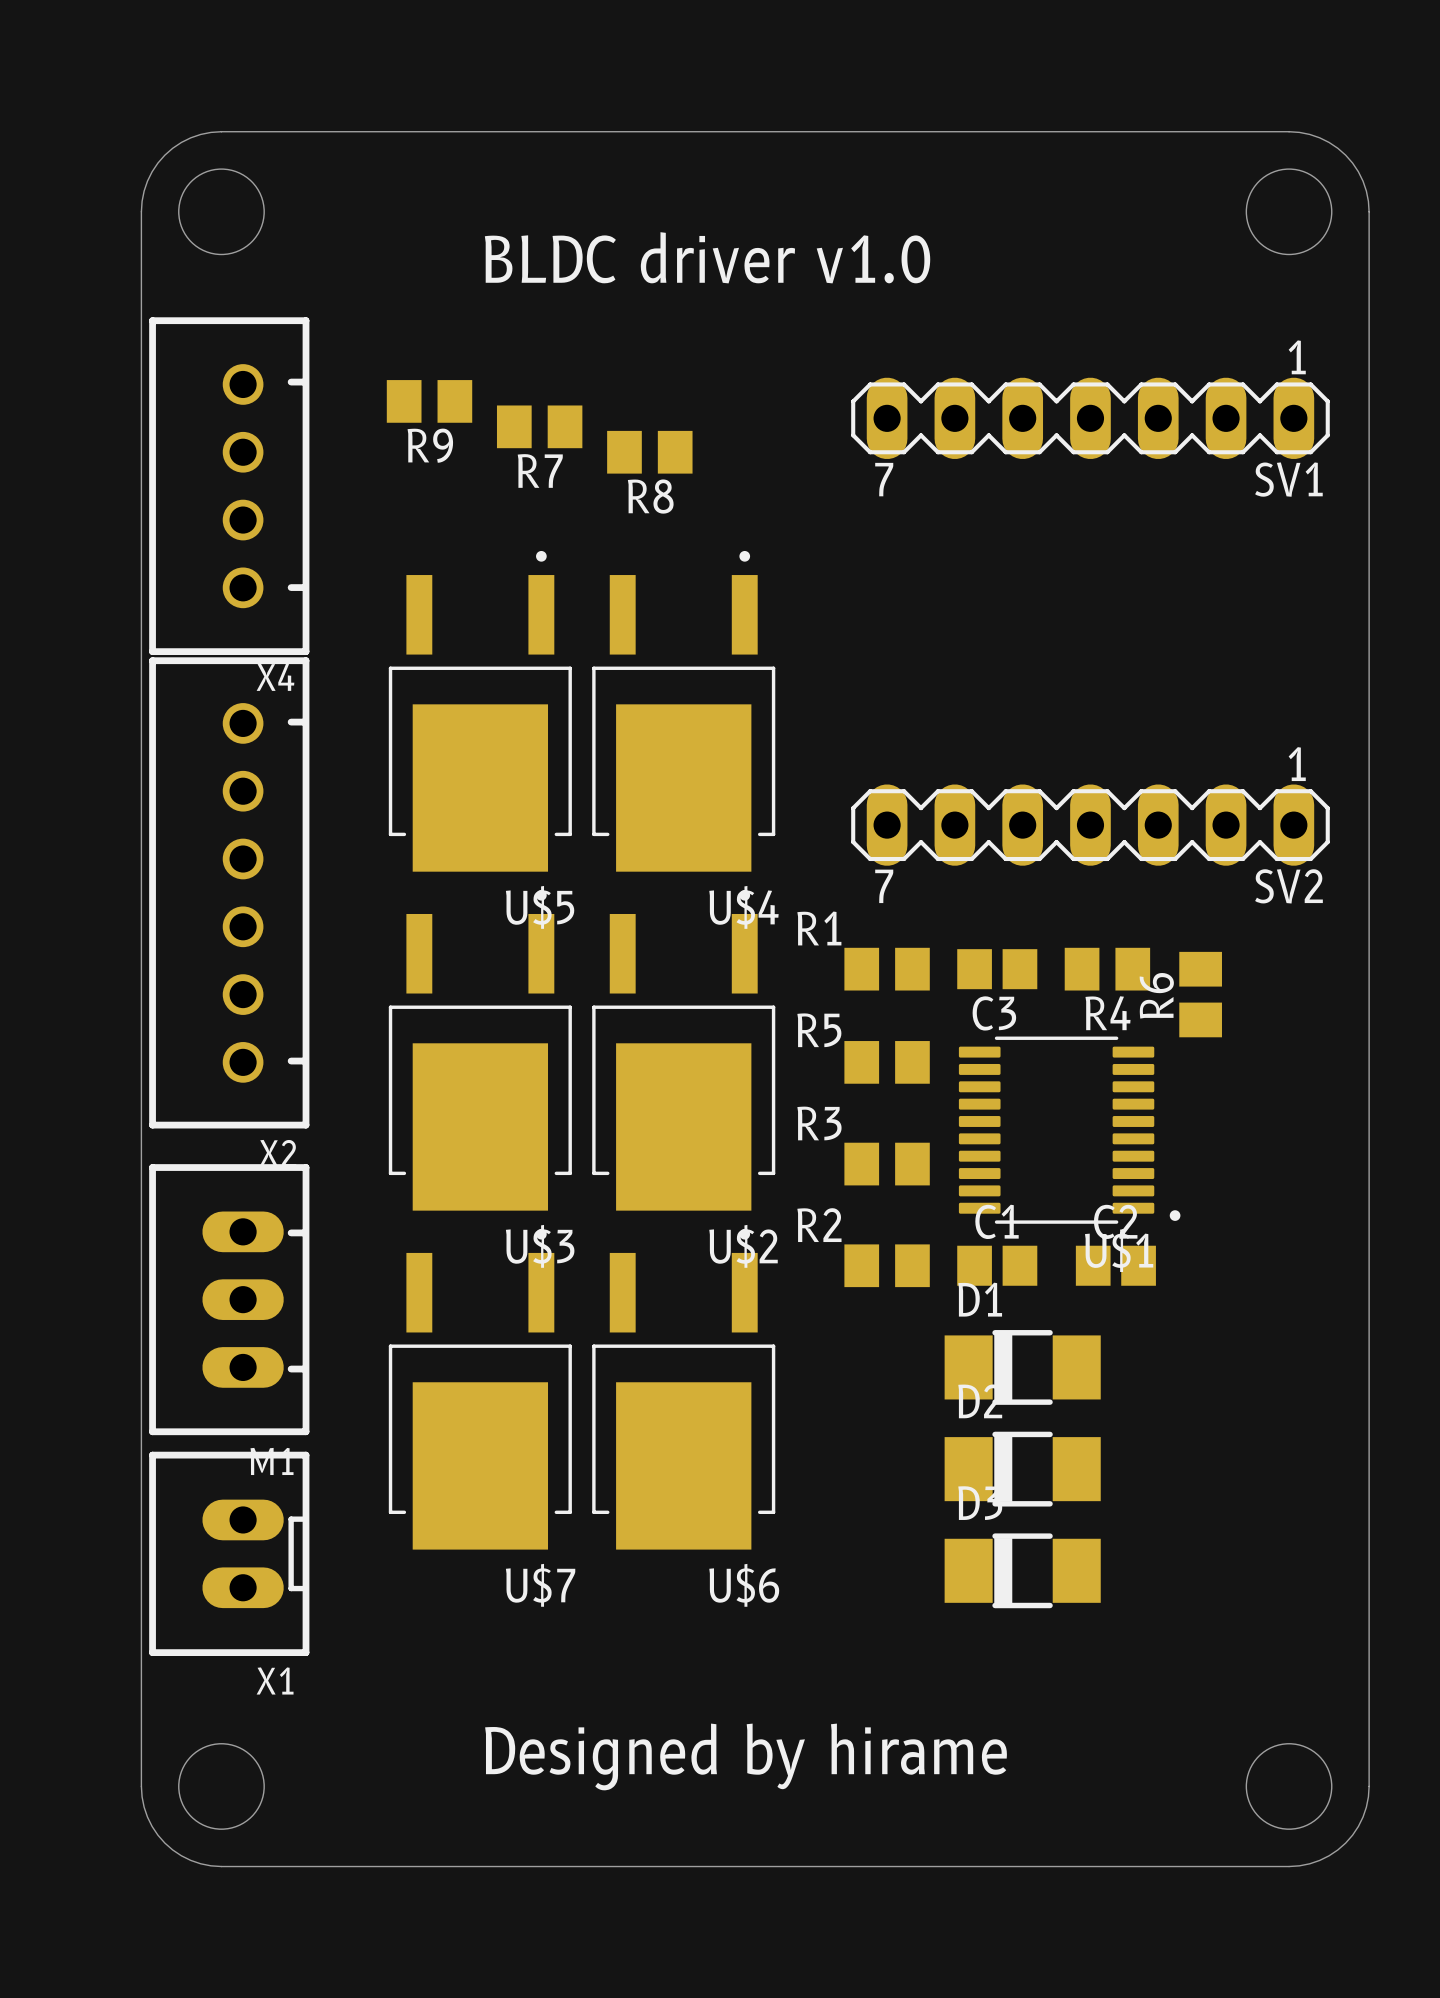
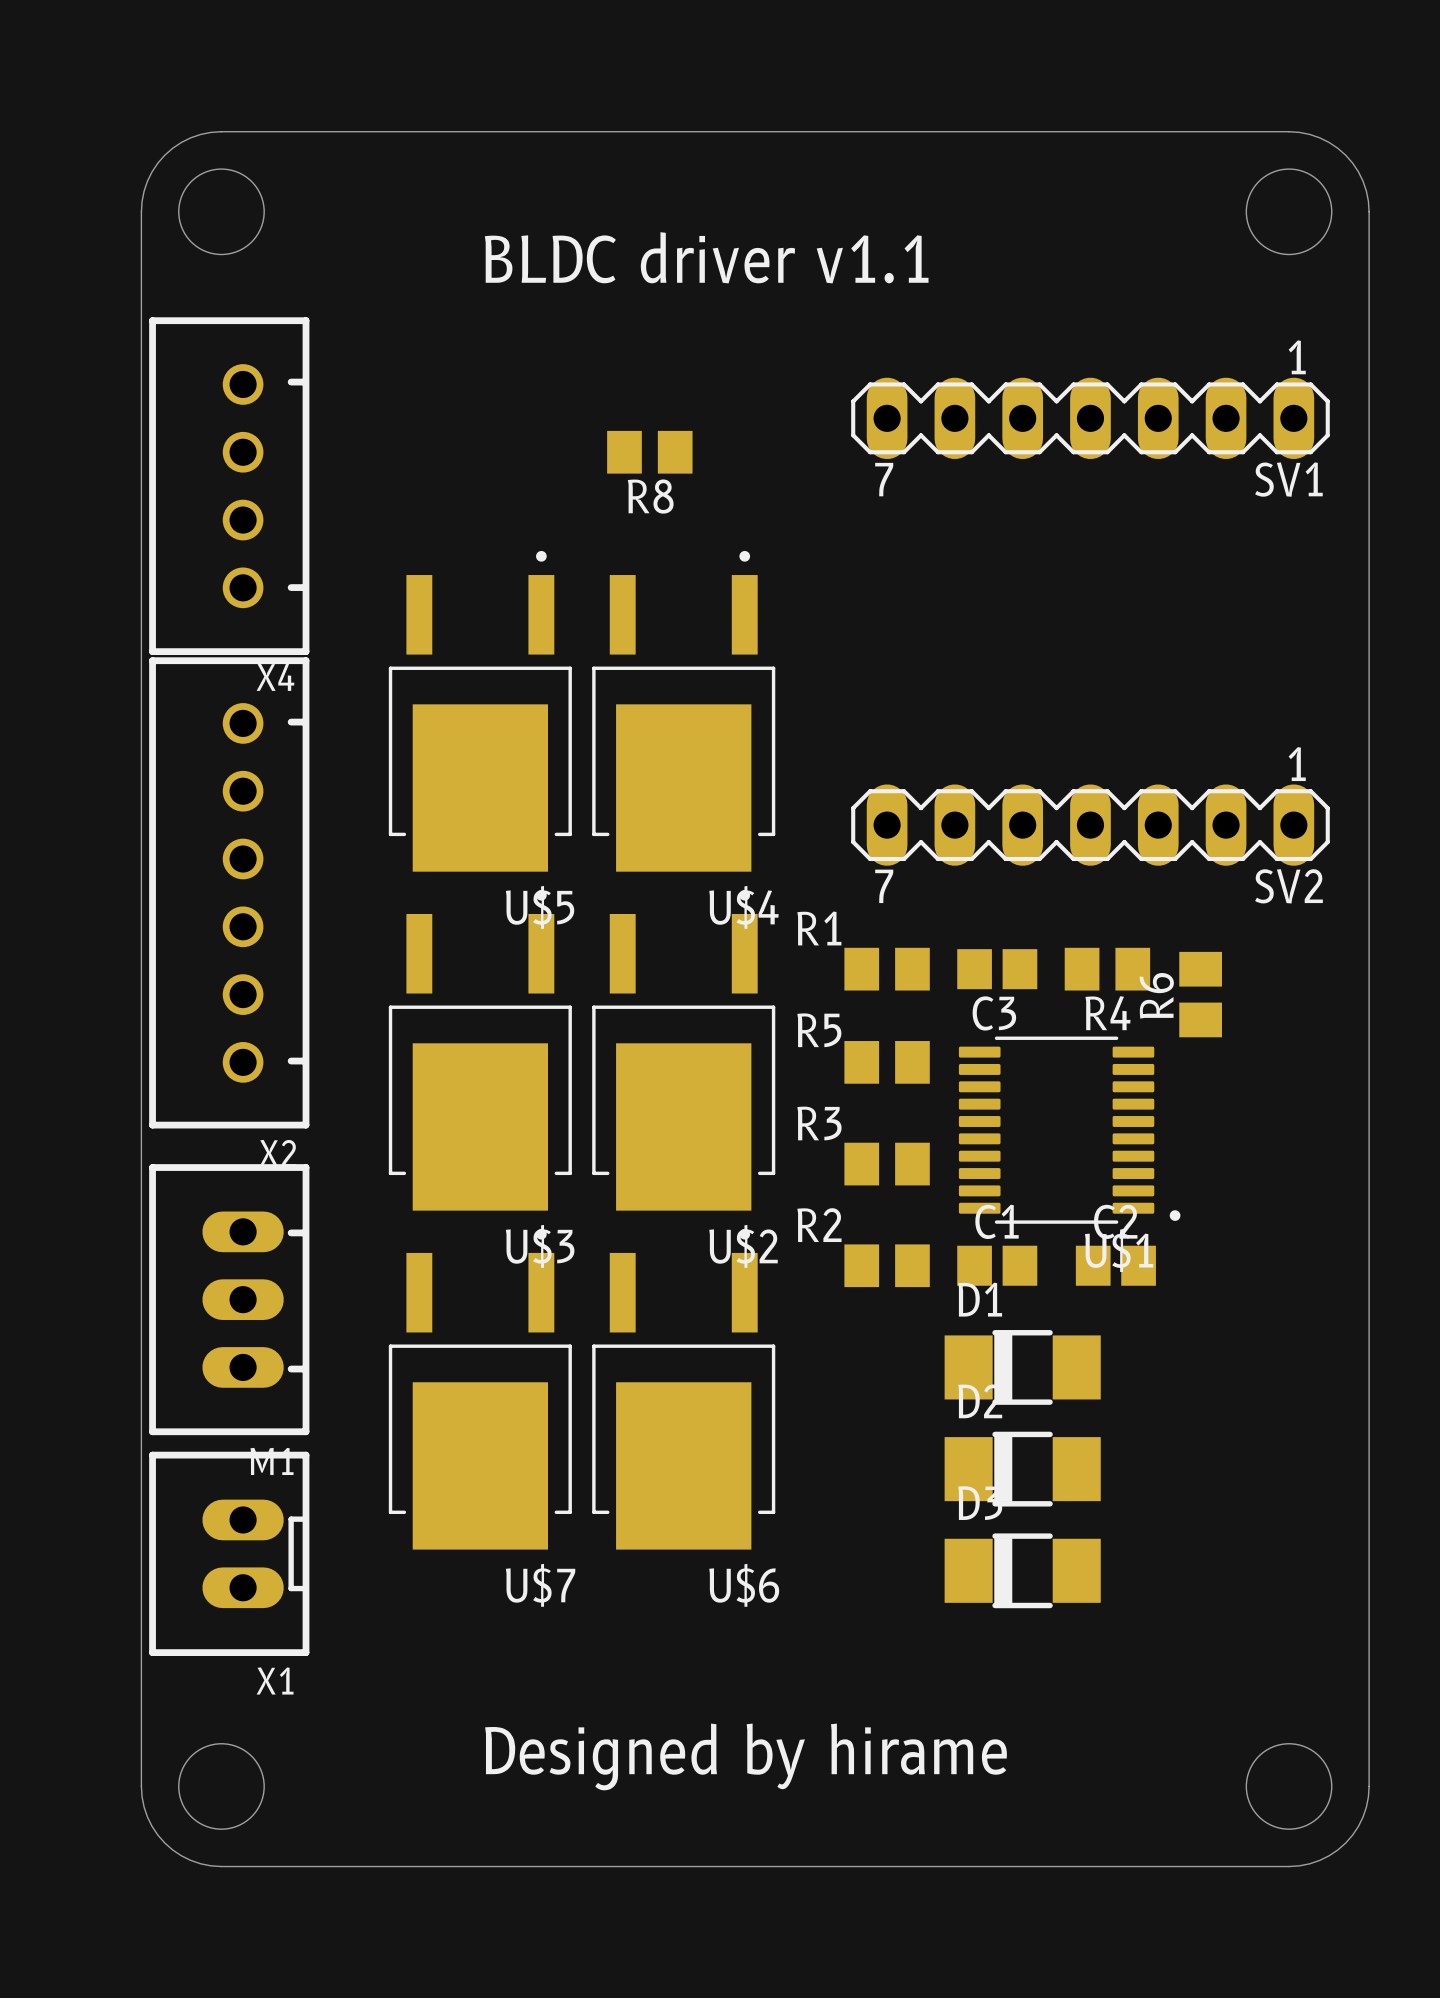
text: BLDC driver v1.0 (707, 257) -> BLDC driver v1.1 (706, 257)
R9: (429, 401) -> none
R7: (539, 426) -> none

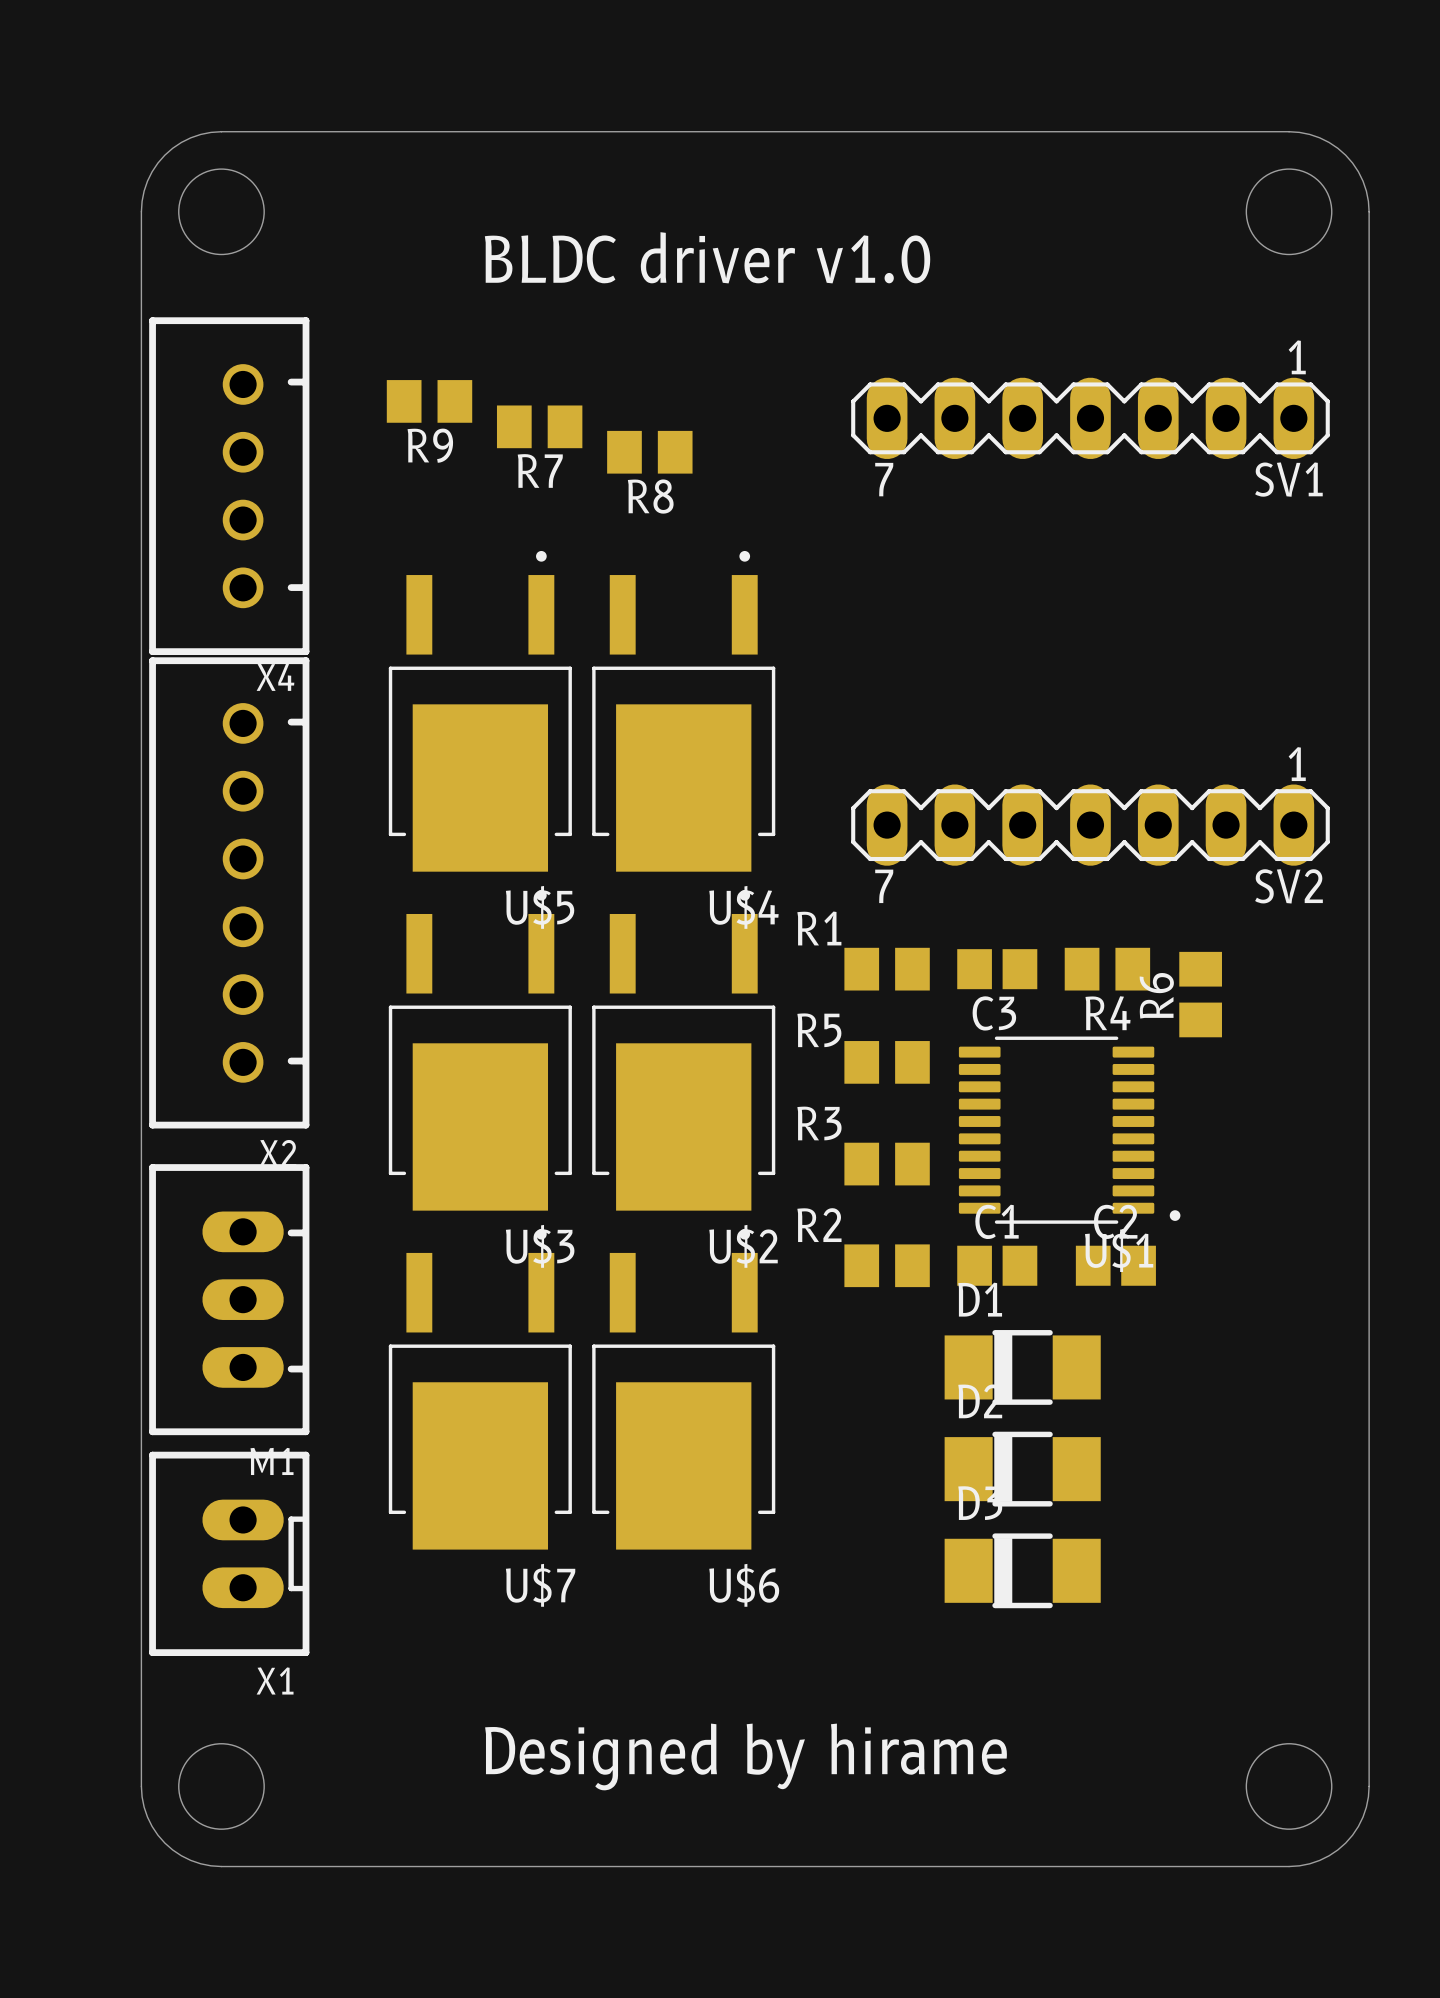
text: BLDC driver v1.1 (706, 257) -> BLDC driver v1.0 (707, 257)
R9: none -> (429, 401)
R7: none -> (539, 426)

